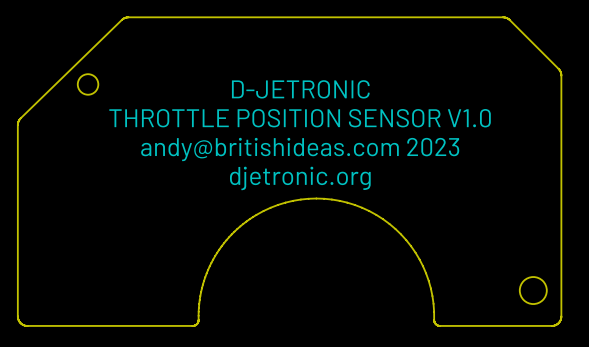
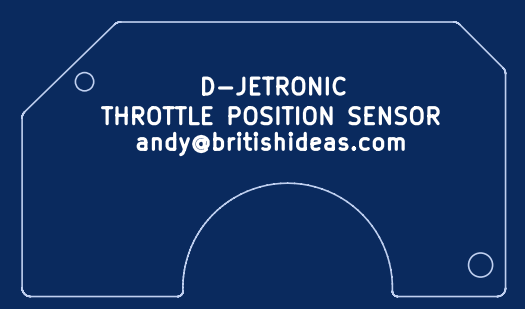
text: THROTTLE POSITION SENSOR V1.0 (300, 118) -> THROTTLE POSITION SENSOR (270, 115)
text: andy@britishideas.com 2023 (300, 149) -> andy@britishideas.com (270, 143)
text: djetronic.org (300, 178) -> none

